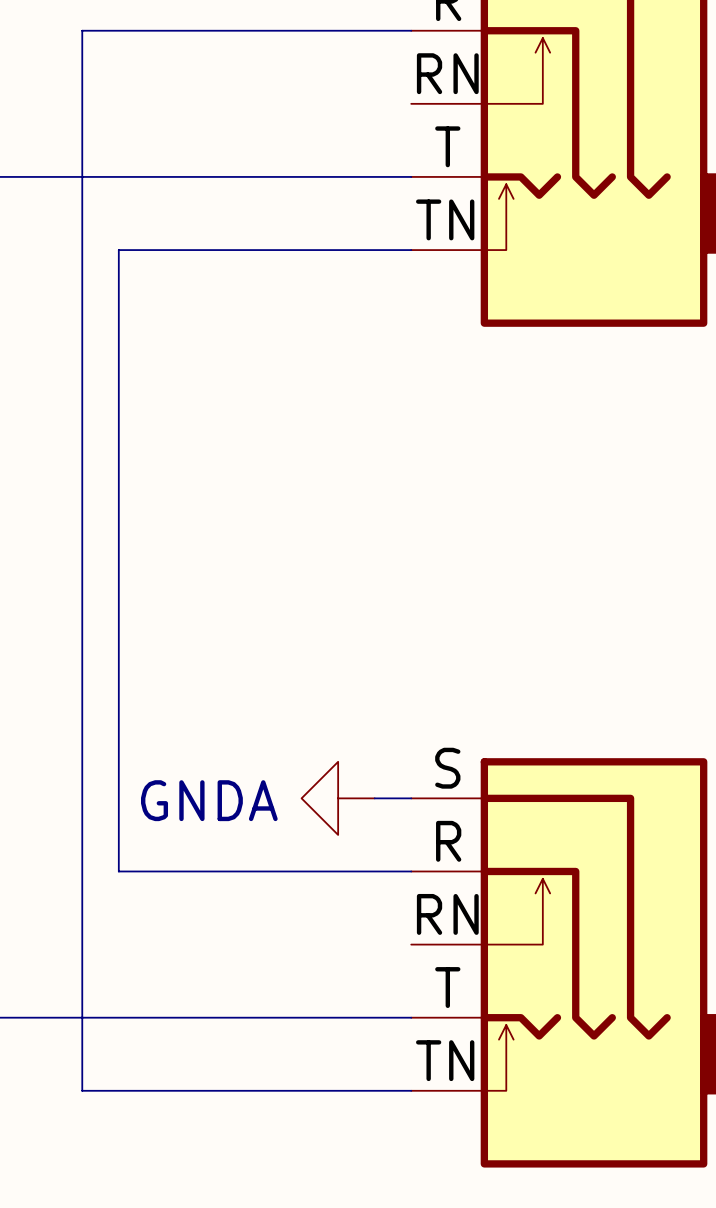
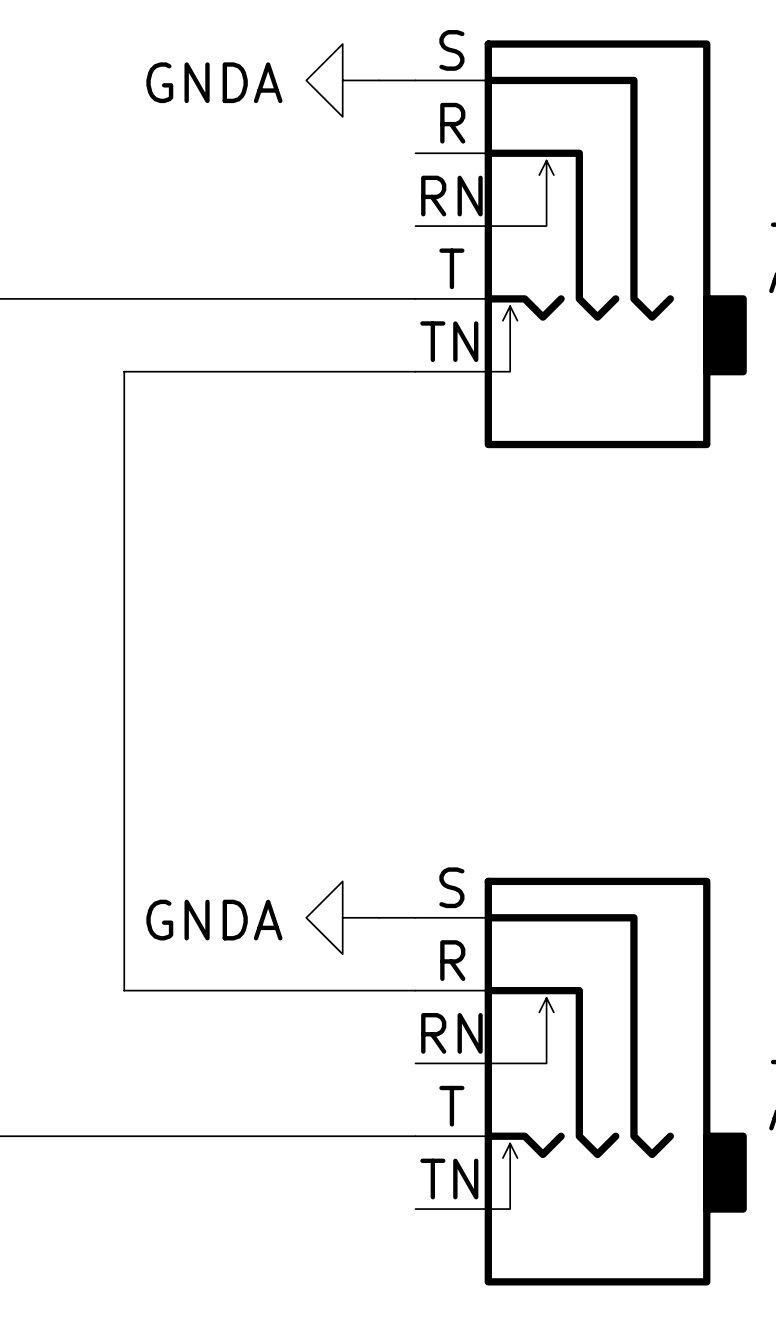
wire: (411, 30) (82, 30) (82, 1090) (411, 1090) -> none

